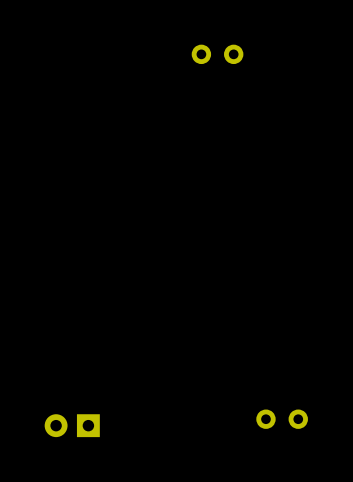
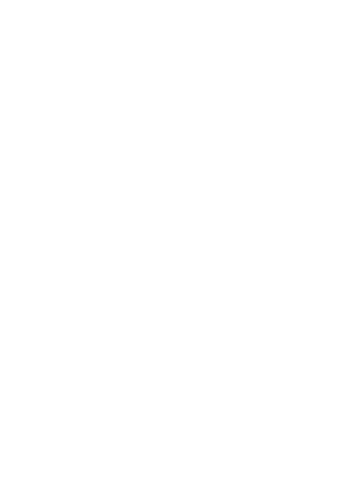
part: (217, 54) -> none
part: (282, 419) -> none
part: (72, 425) -> none

